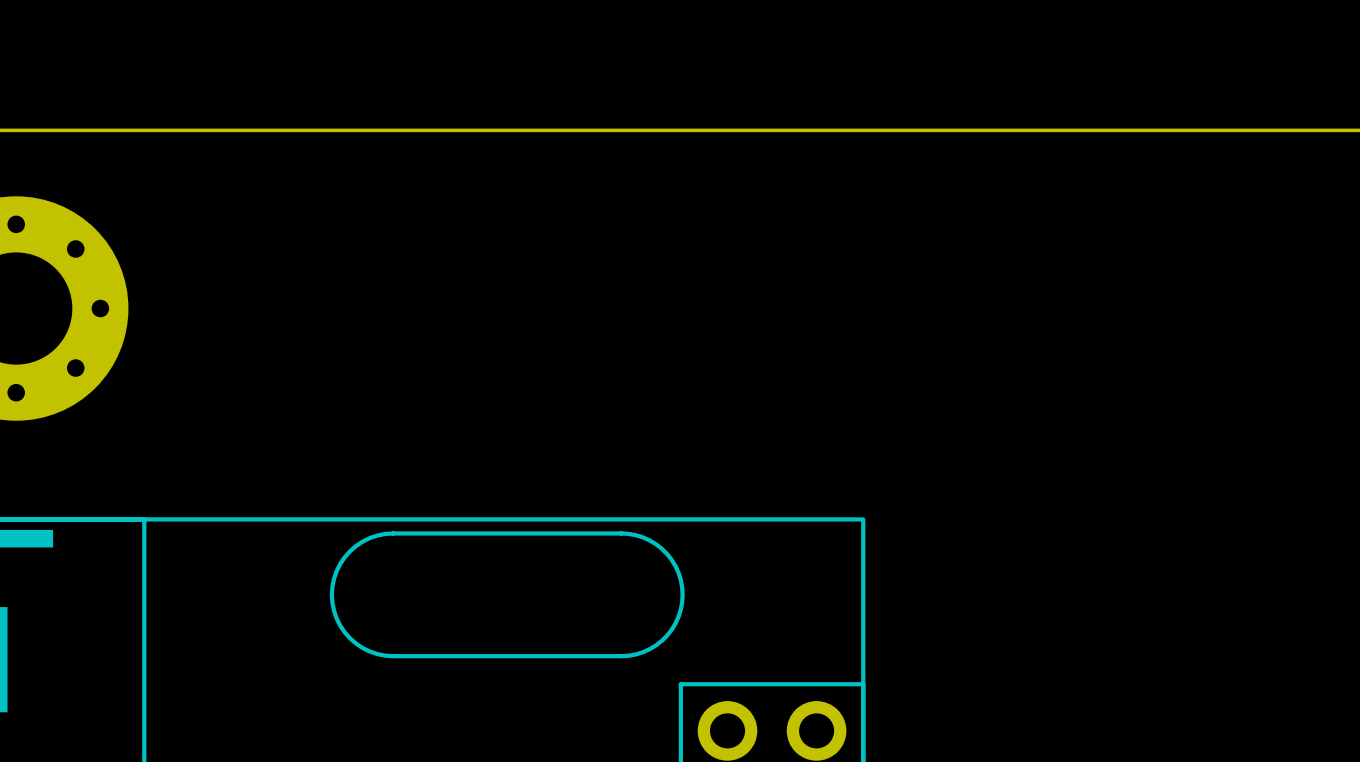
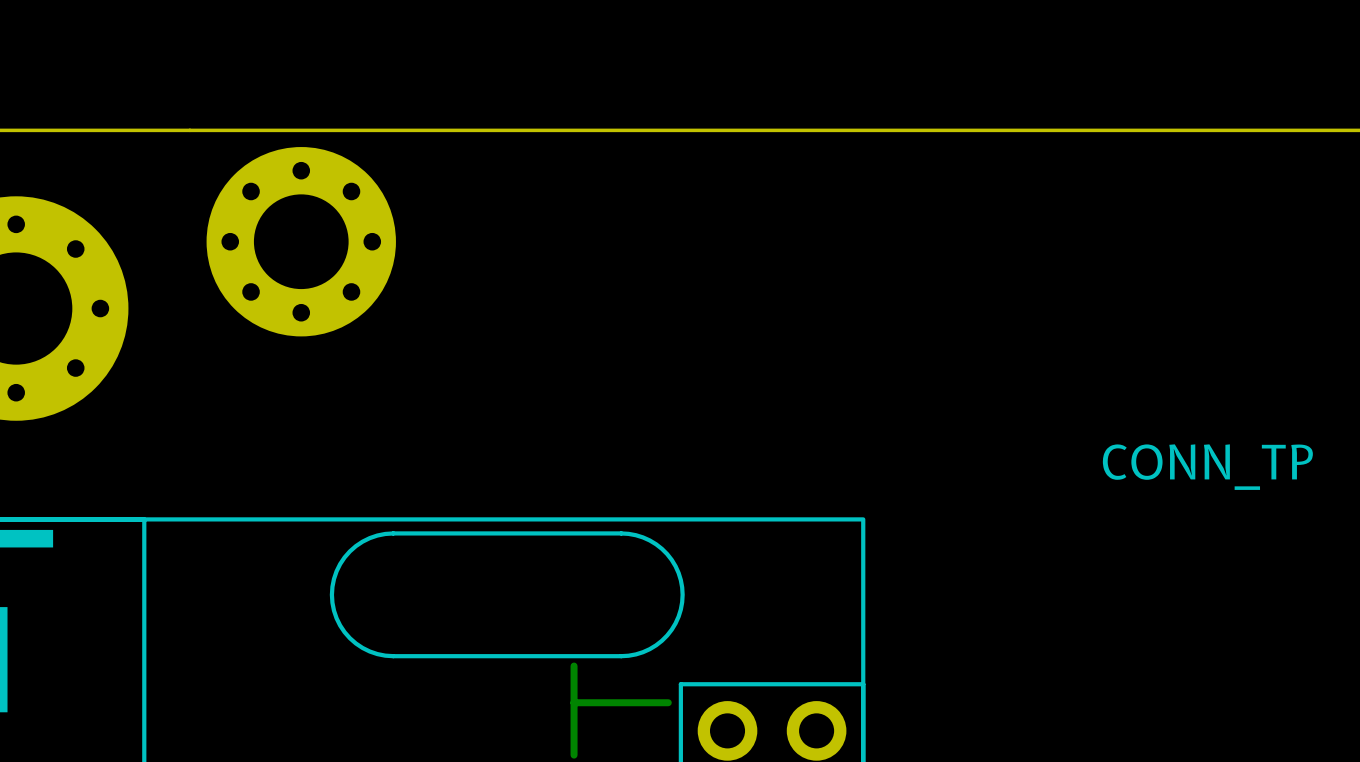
part: none -> (301, 241)
text: none -> CONN_TP (1207, 467)
track: none -> (574, 666) (574, 755)
track: none -> (668, 702) (574, 702)

